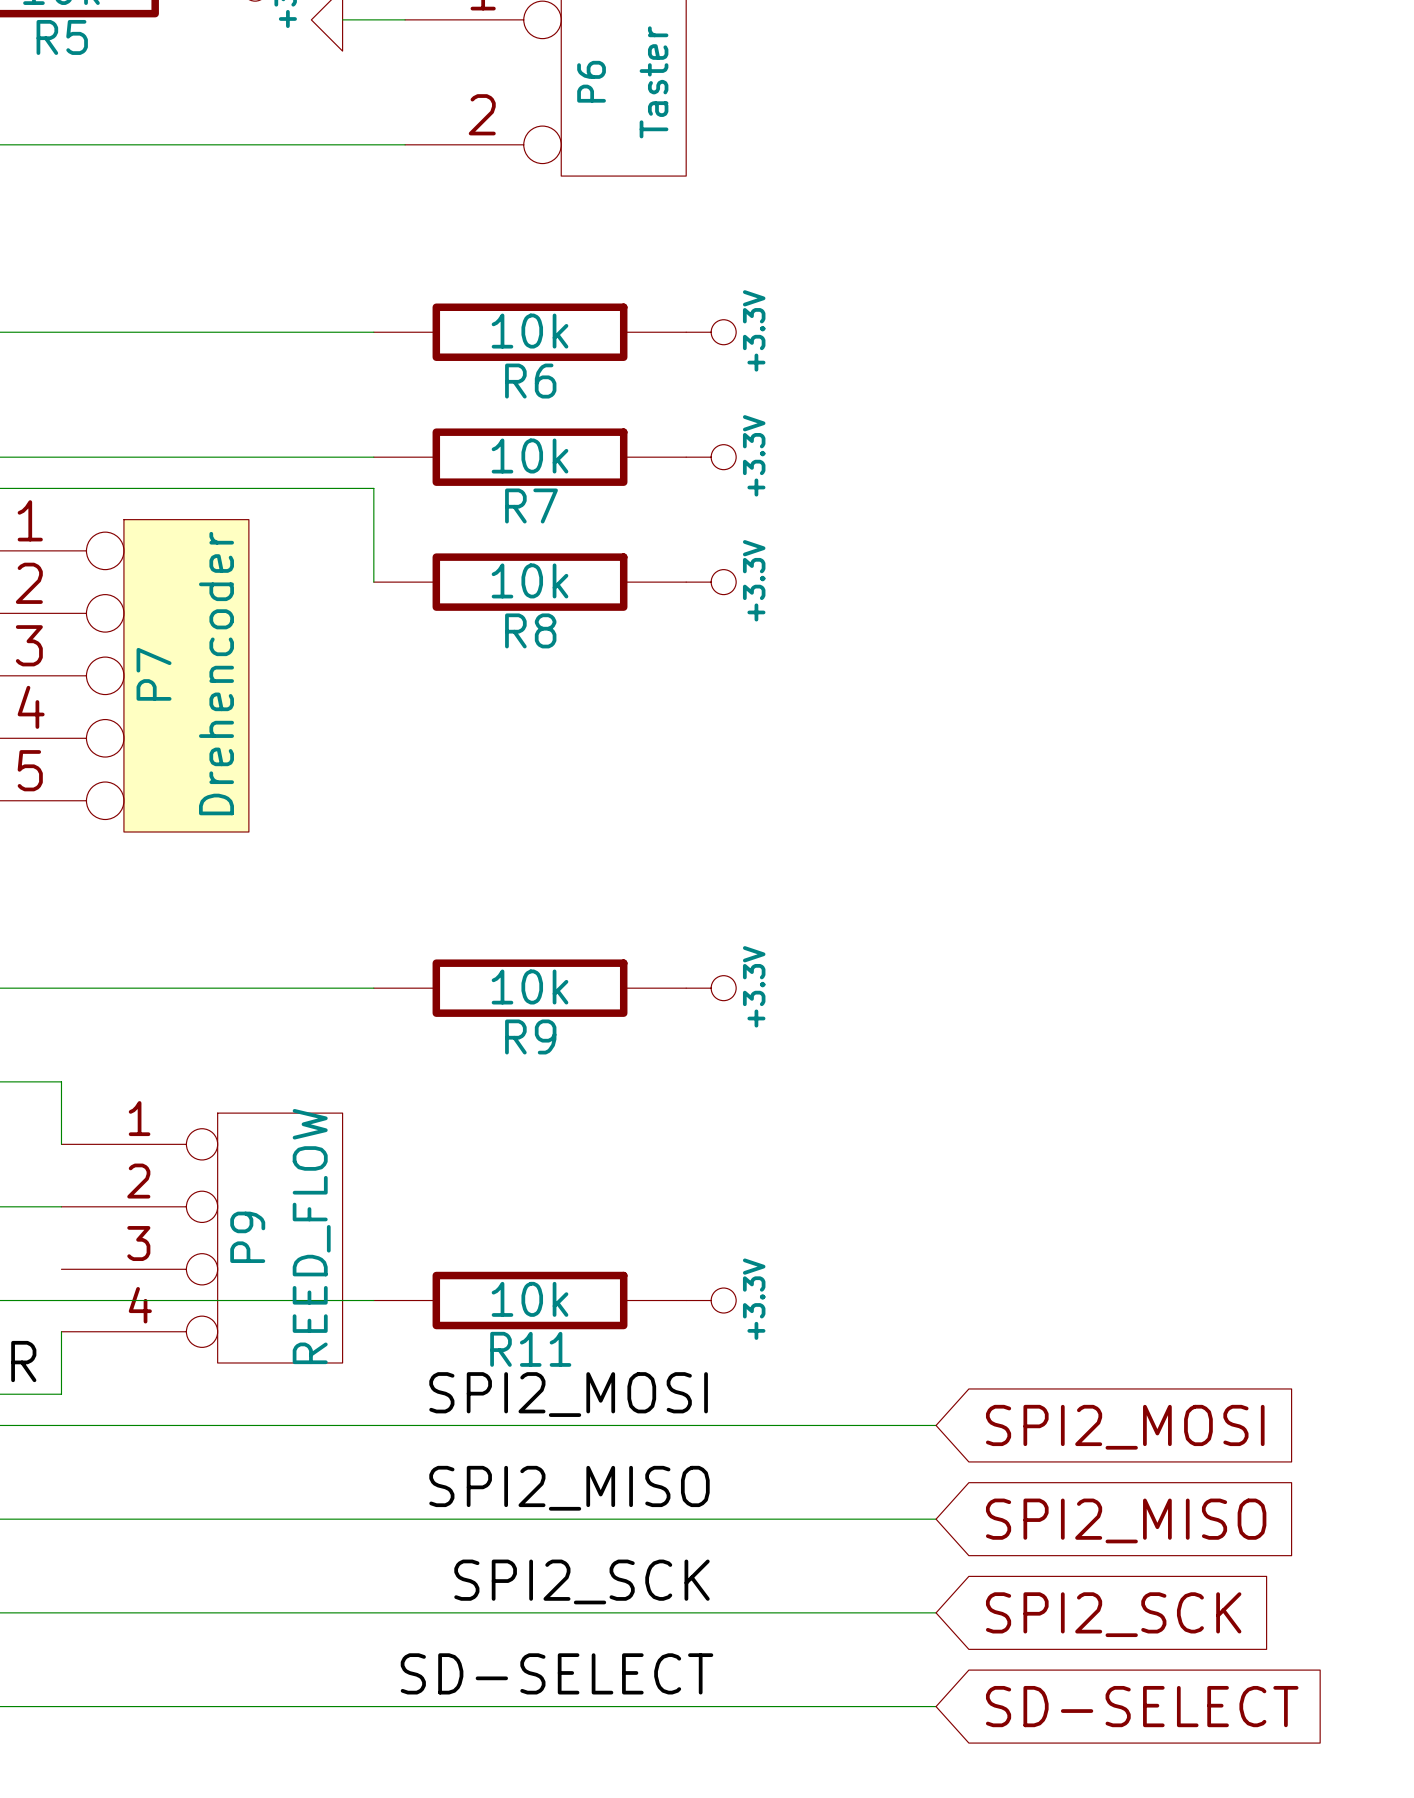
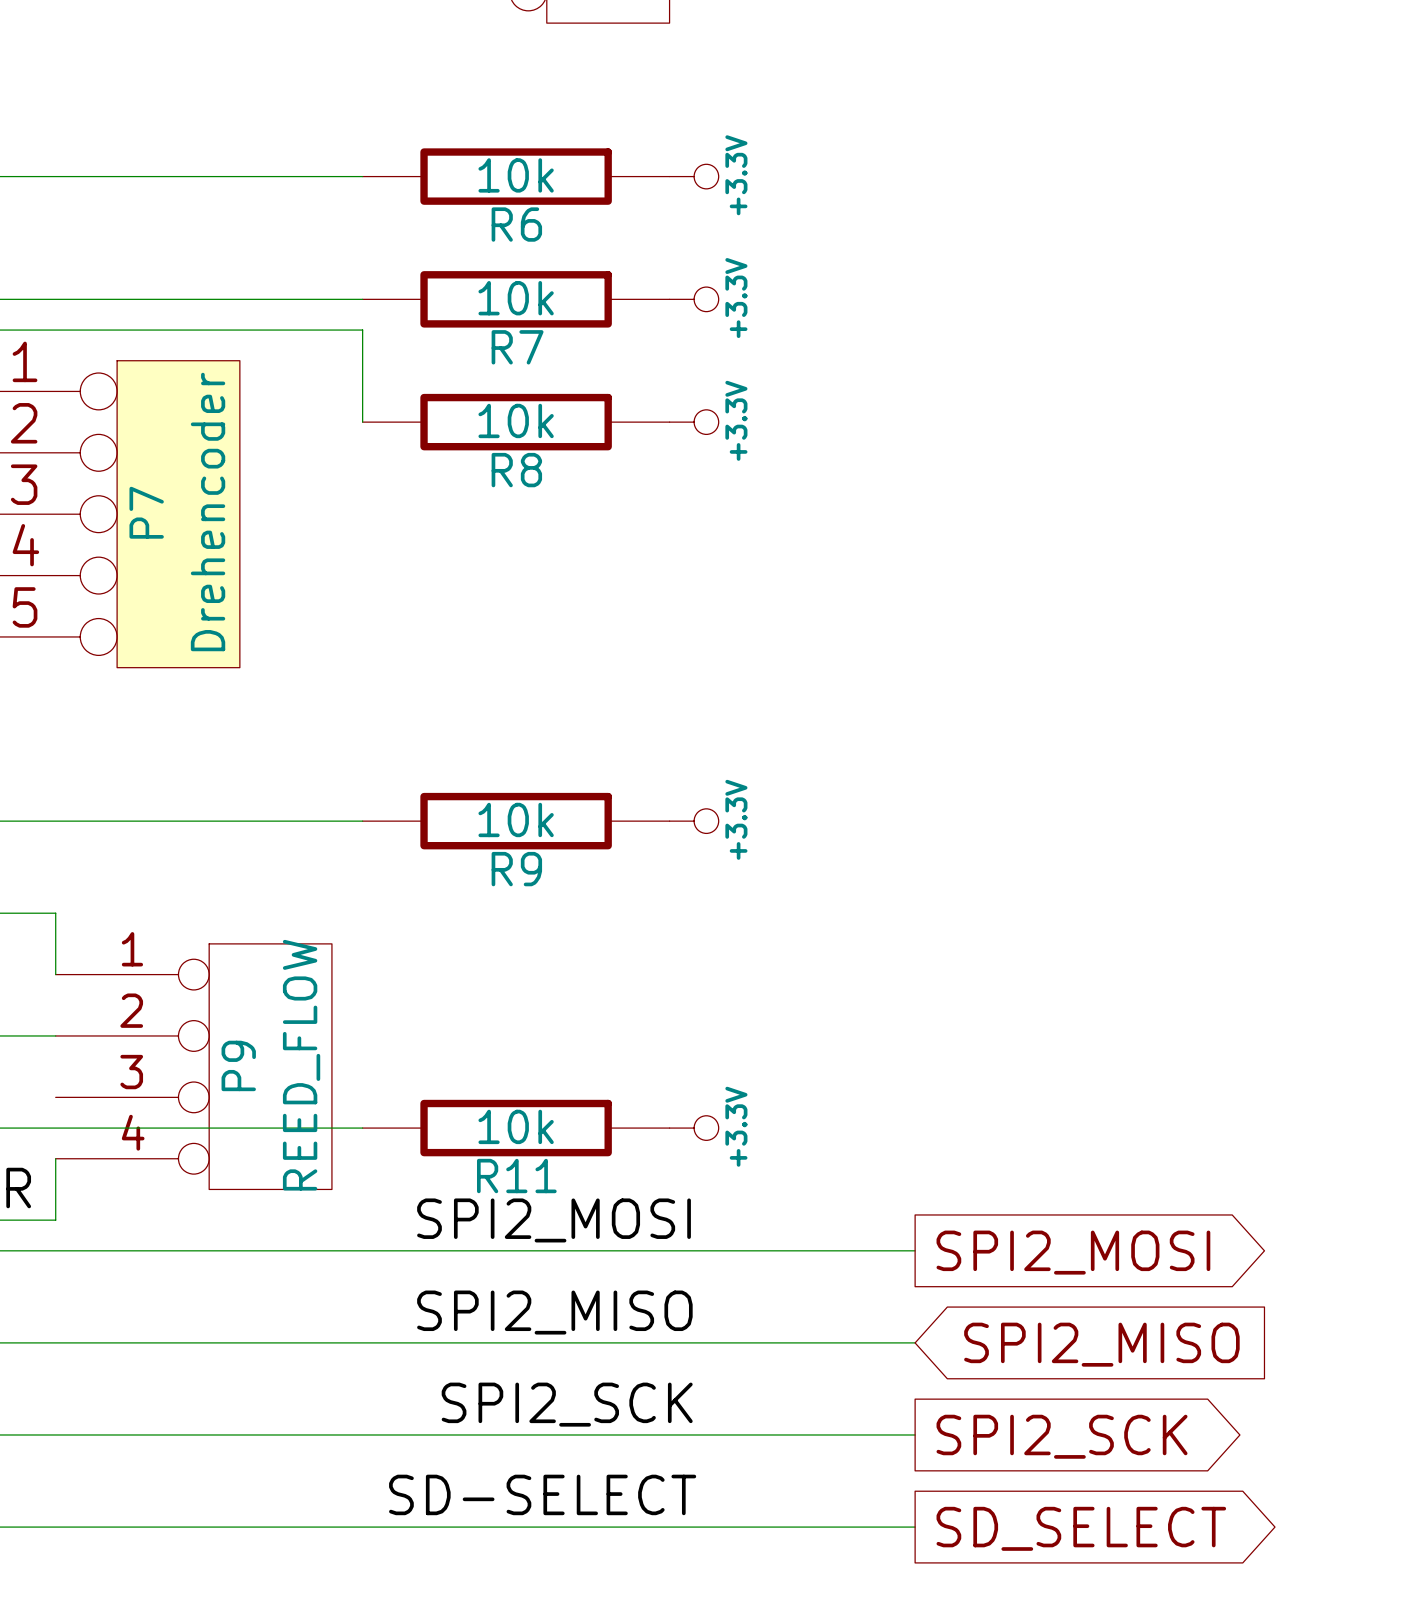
global label shape: input (1125, 1427) -> output (1073, 1252)
global label shape: input (1113, 1614) -> output (1062, 1436)
global label shape: input (1142, 1706) -> output (1081, 1528)
global label: SD-SELECT (1142, 1706) -> SD_SELECT (1081, 1528)

